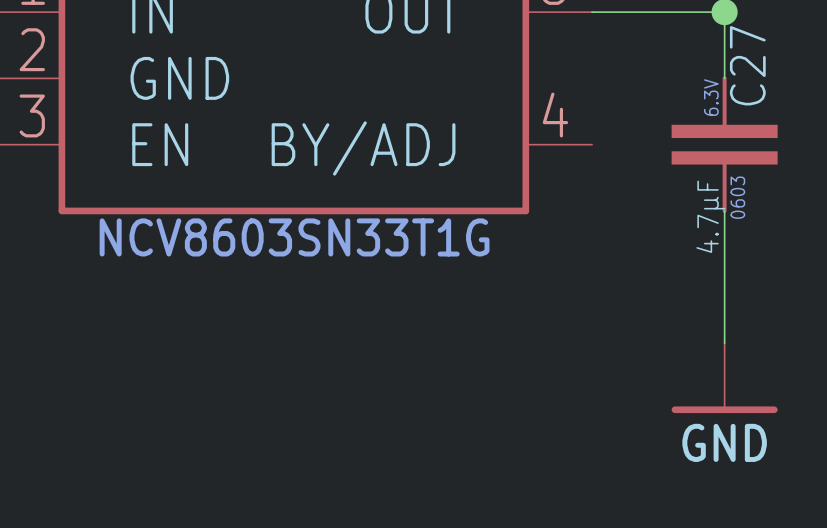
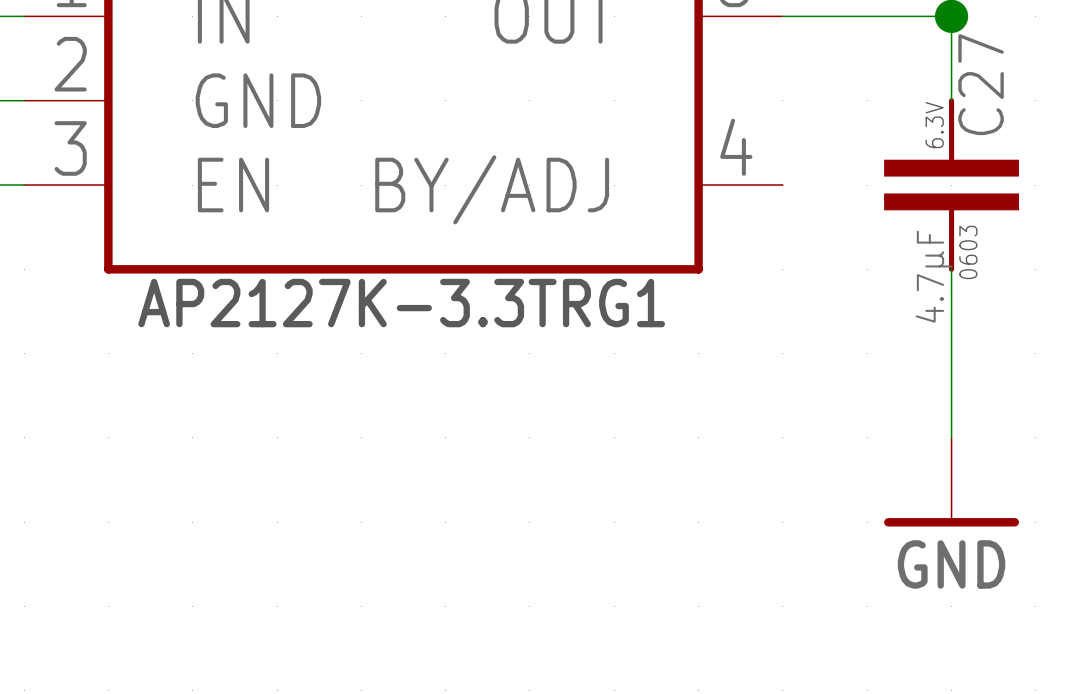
part text: NCV8603SN33T1G (294, 237) -> AP2127K-3.3TRG1 (401, 303)

